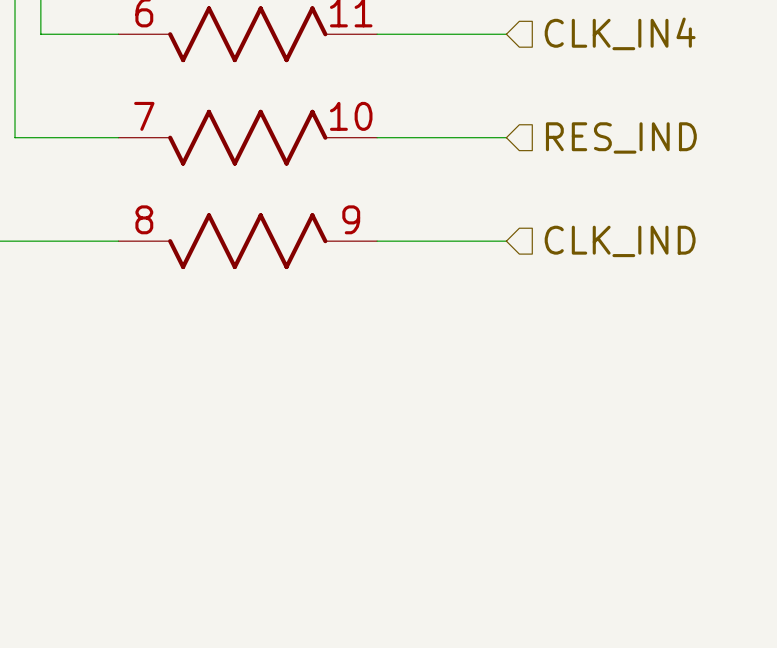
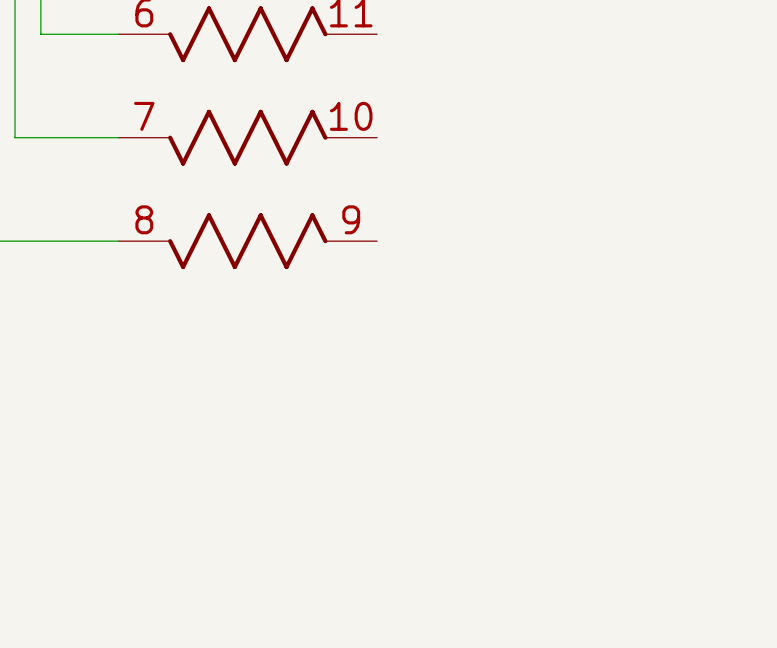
hierarchical label: CLK_IN4 (620, 33) -> none
wire: (377, 34) (506, 34) -> none
wire: (377, 137) (506, 137) -> none
hierarchical label: RES_IND (621, 137) -> none
wire: (377, 241) (506, 241) -> none
hierarchical label: CLK_IND (620, 241) -> none

